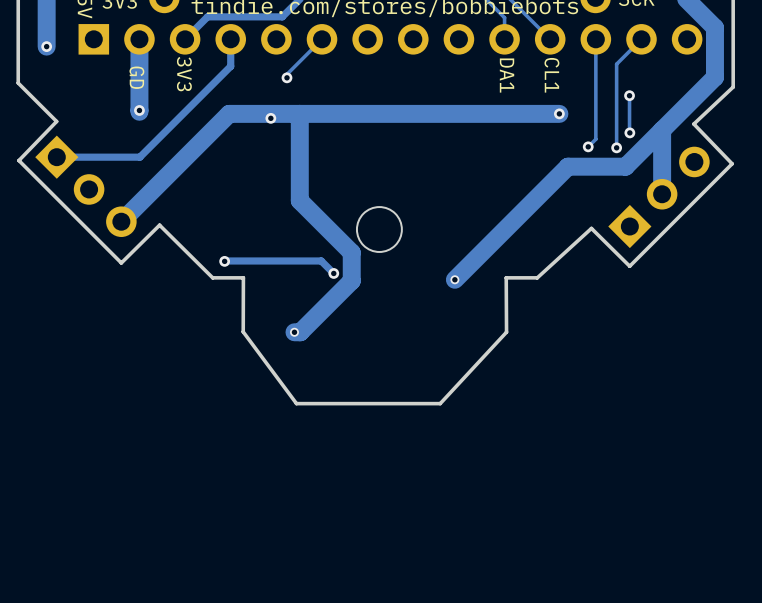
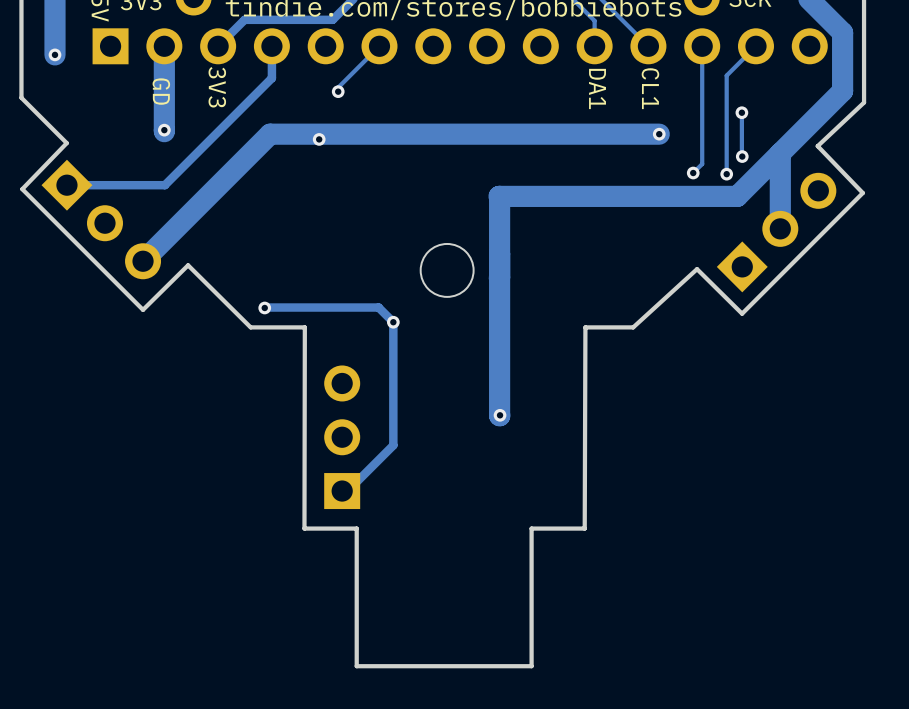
track: (299, 113) (299, 200) (351, 252) (351, 280) (300, 332) (294, 332) -> none
track: none -> (499, 196) (499, 415)
track: (567, 166) (454, 279) -> (669, 196) (499, 196)
track: none -> (393, 322) (393, 445) (341, 496)
board edge: (506, 277) (506, 332) (440, 403) (296, 403) (243, 331) (243, 277) -> (596, 327) (585, 327) (584, 528) (531, 528) (531, 666) (356, 666) (356, 528) (304, 528) (304, 327) (286, 327)
via: (454, 279) -> none
via: (294, 332) -> none
via: none -> (500, 415)
part: none -> (342, 437)

